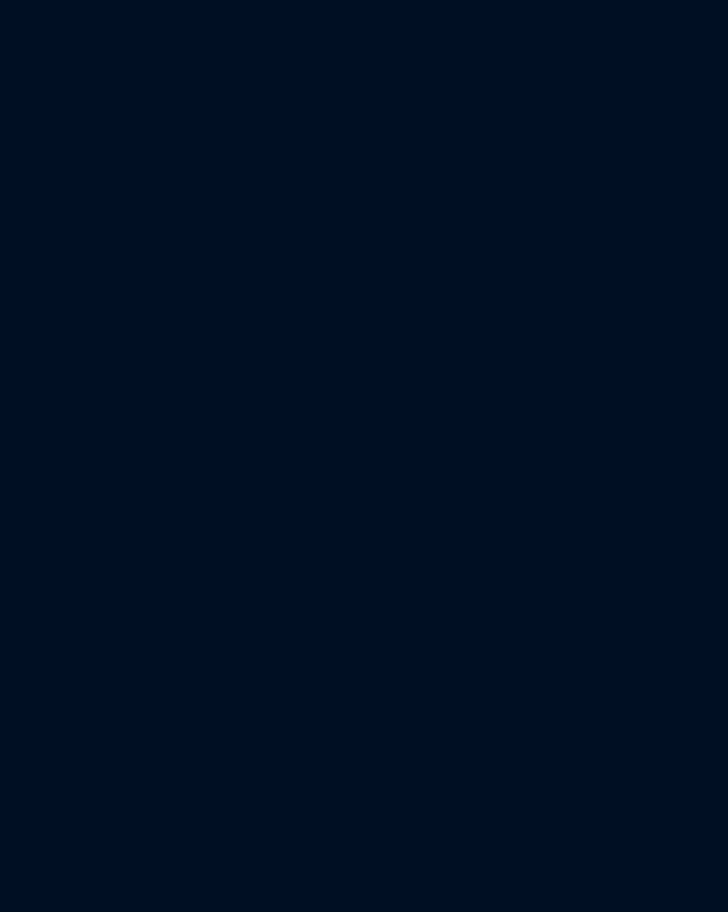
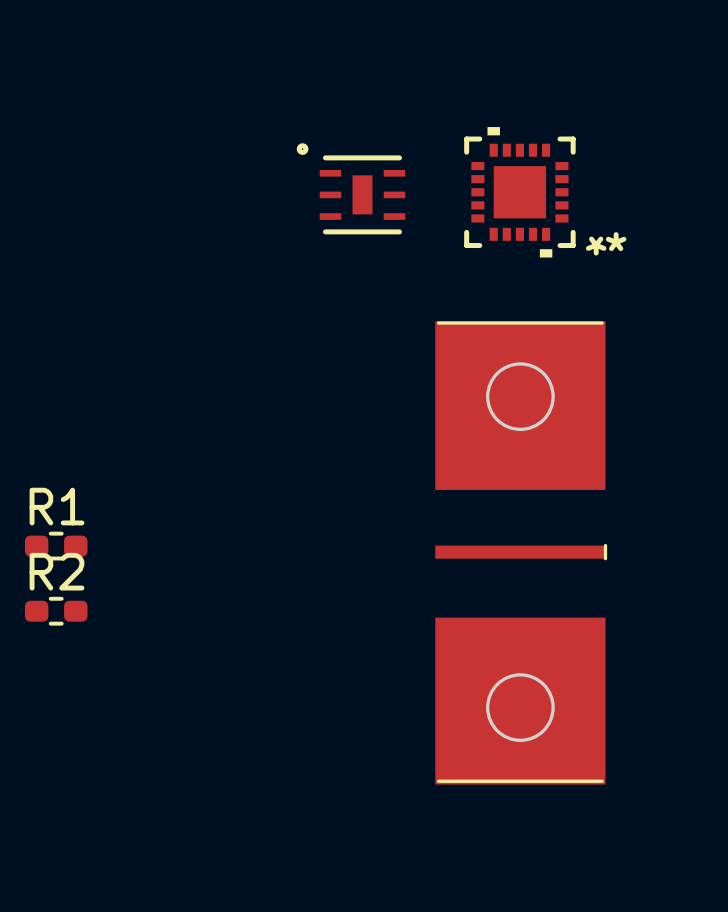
part: none -> (351, 188)
part: none -> (519, 192)
R1: none -> (56, 546)
part: none -> (521, 552)
R2: none -> (56, 611)

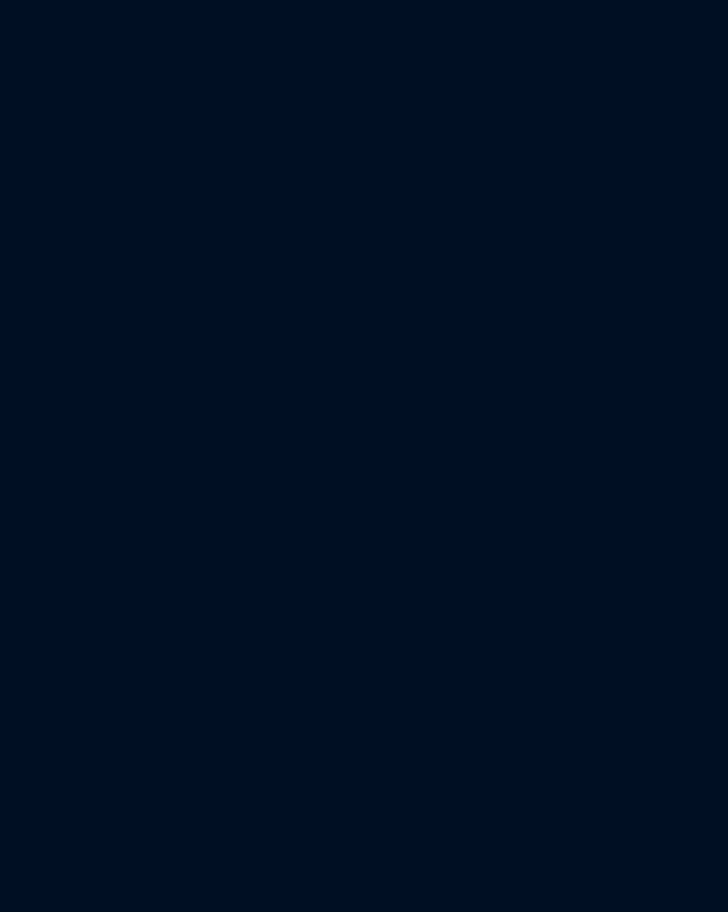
part: (351, 188) -> none
part: (519, 192) -> none
R1: (56, 546) -> none
part: (521, 552) -> none
R2: (56, 611) -> none

